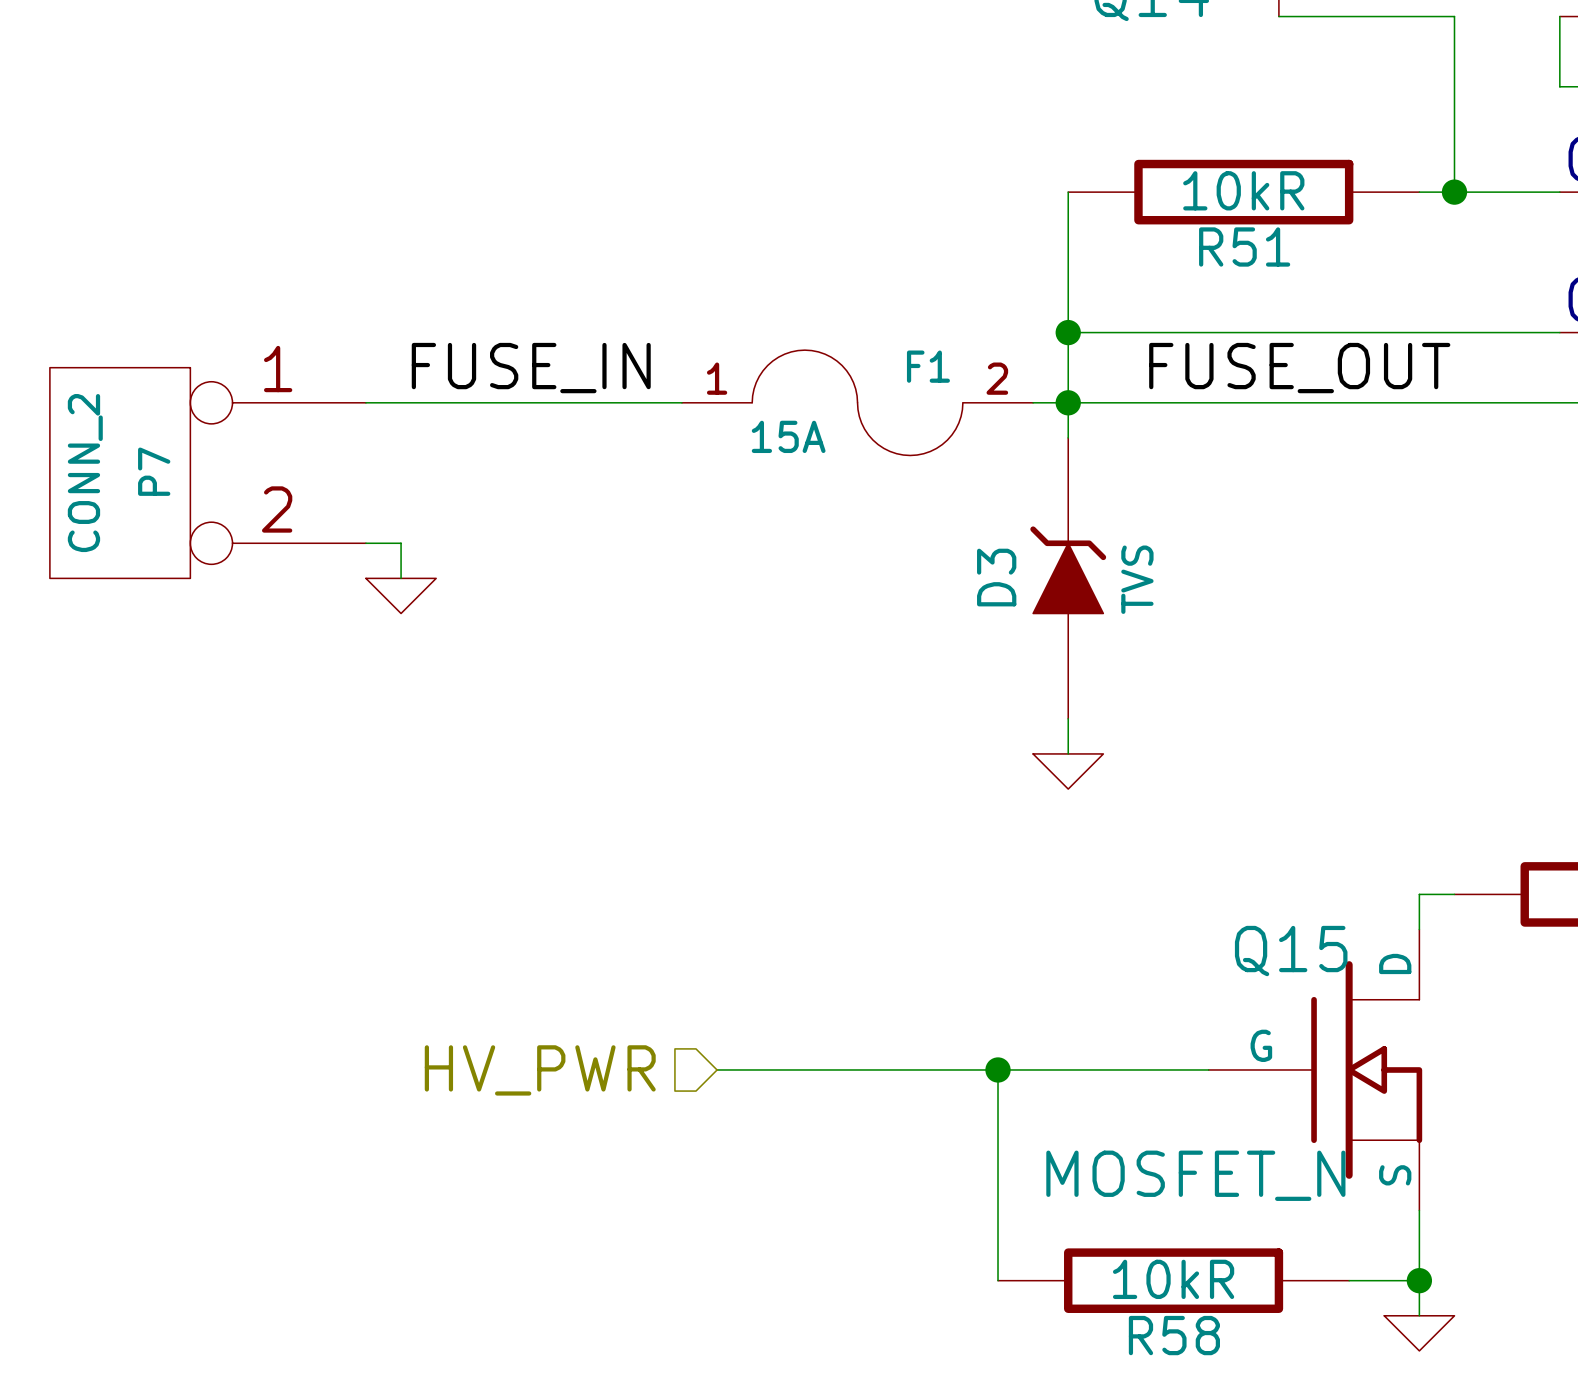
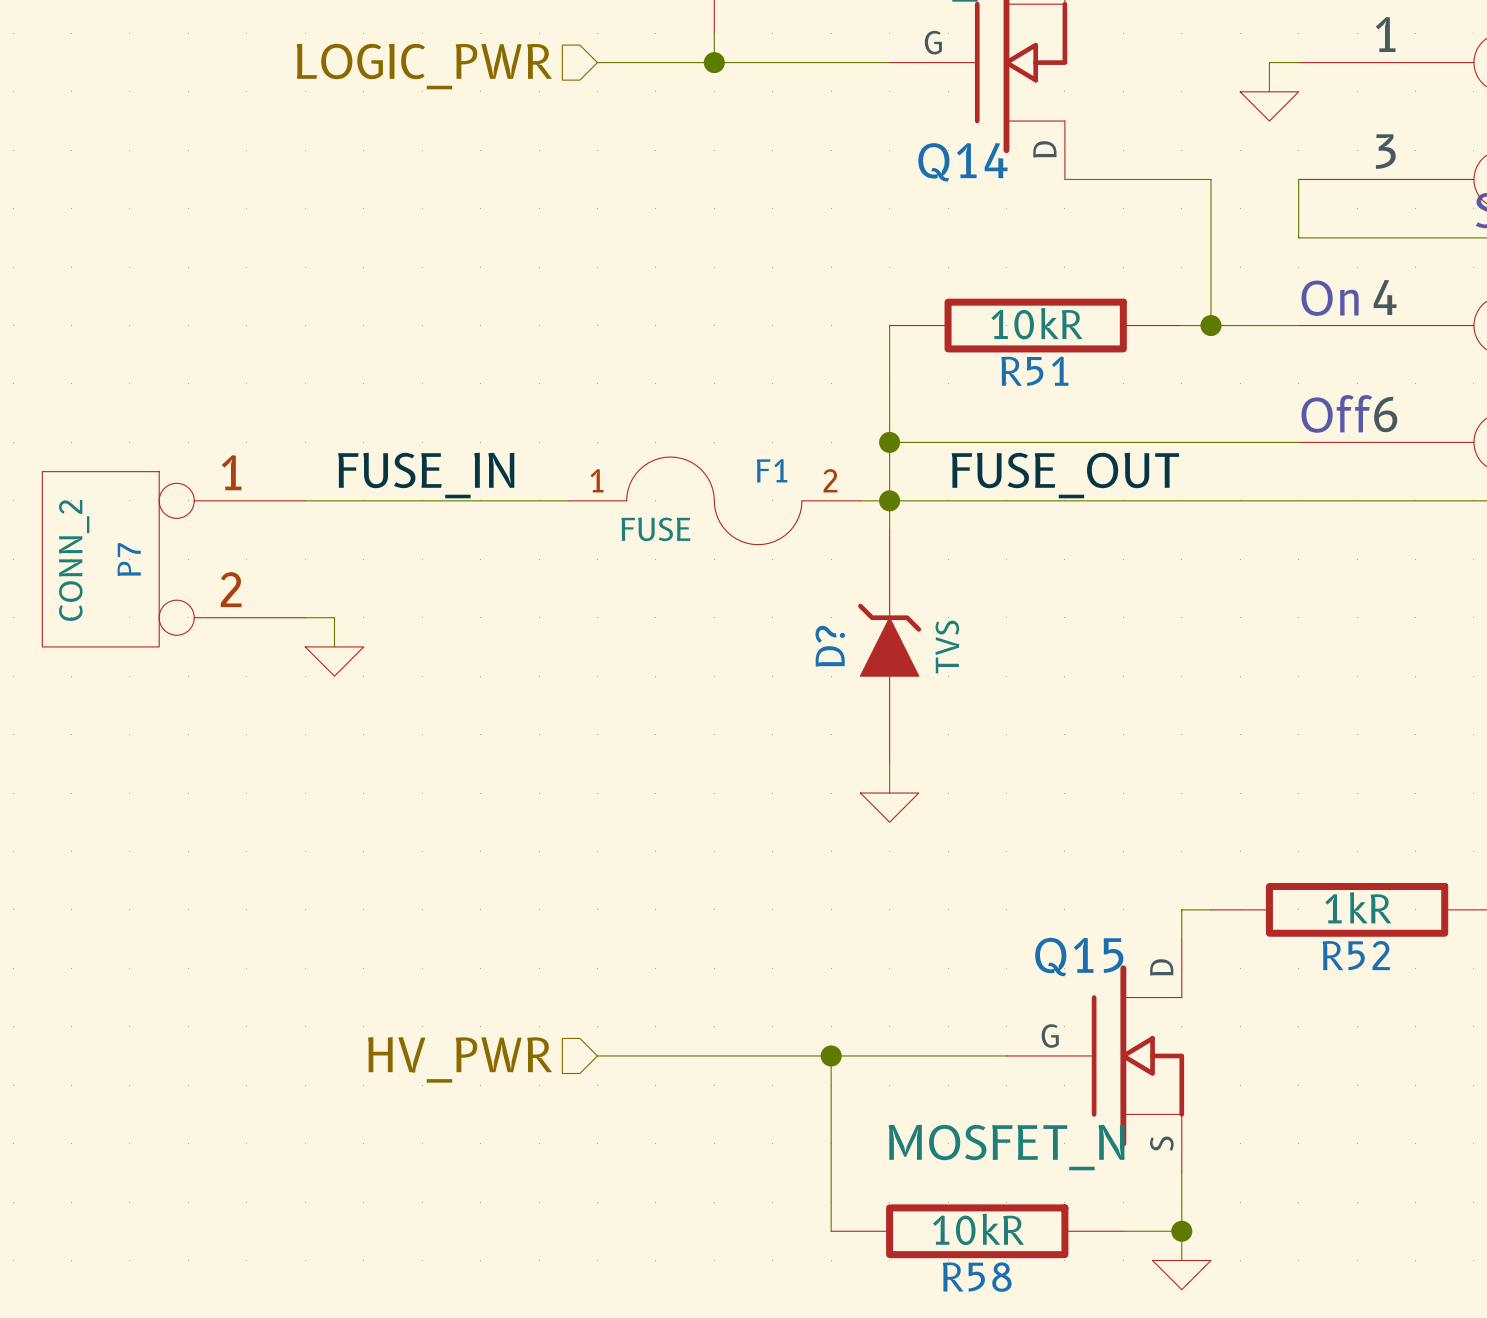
F1 value: 15A (788, 436) -> FUSE (655, 529)
D3 name: D3 (996, 577) -> D? (830, 646)

